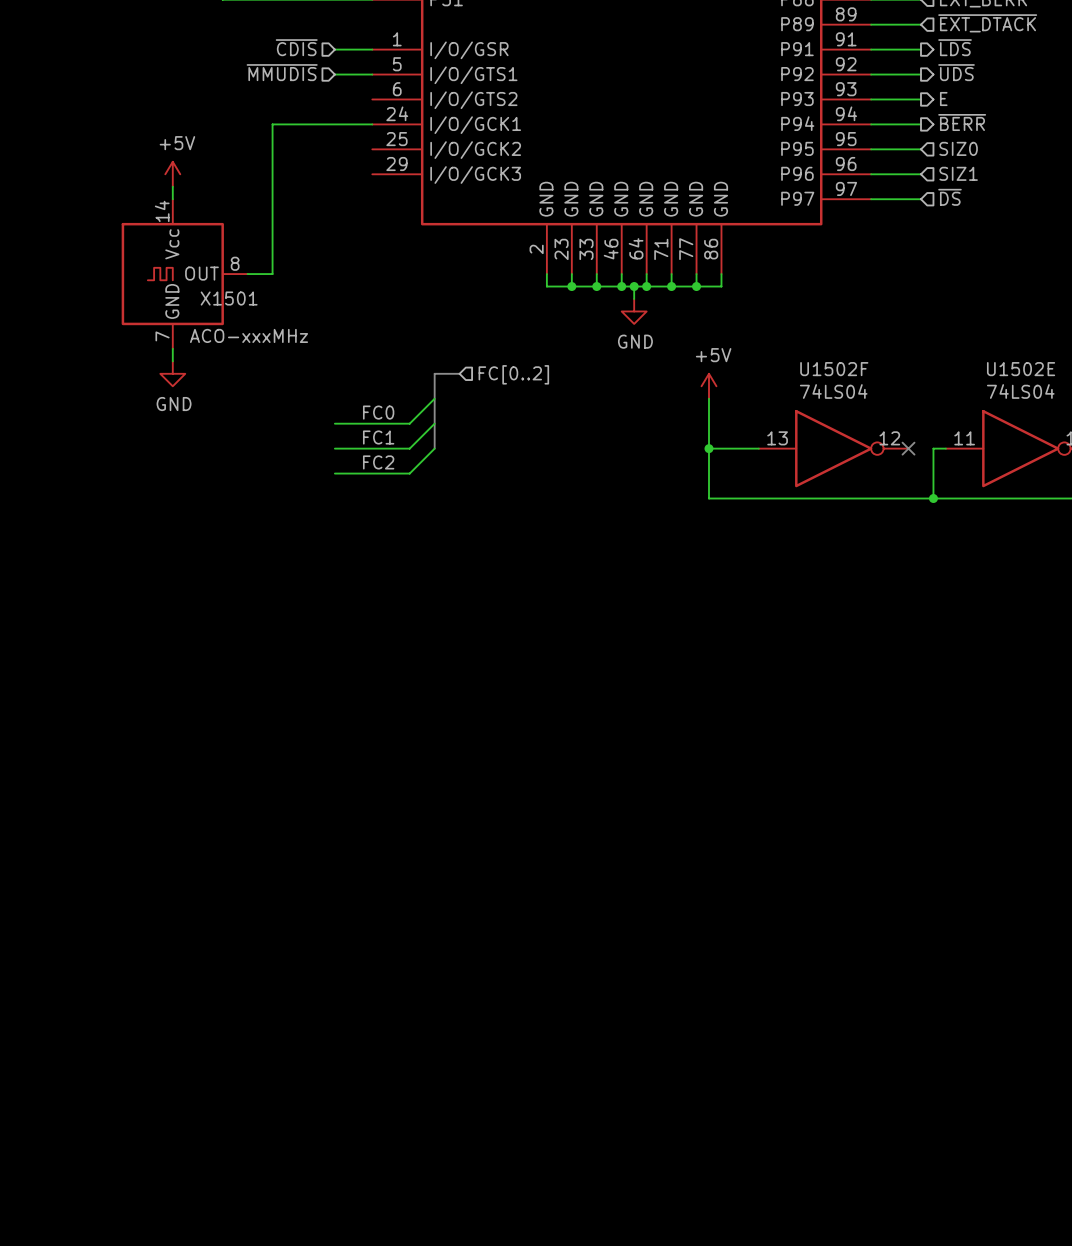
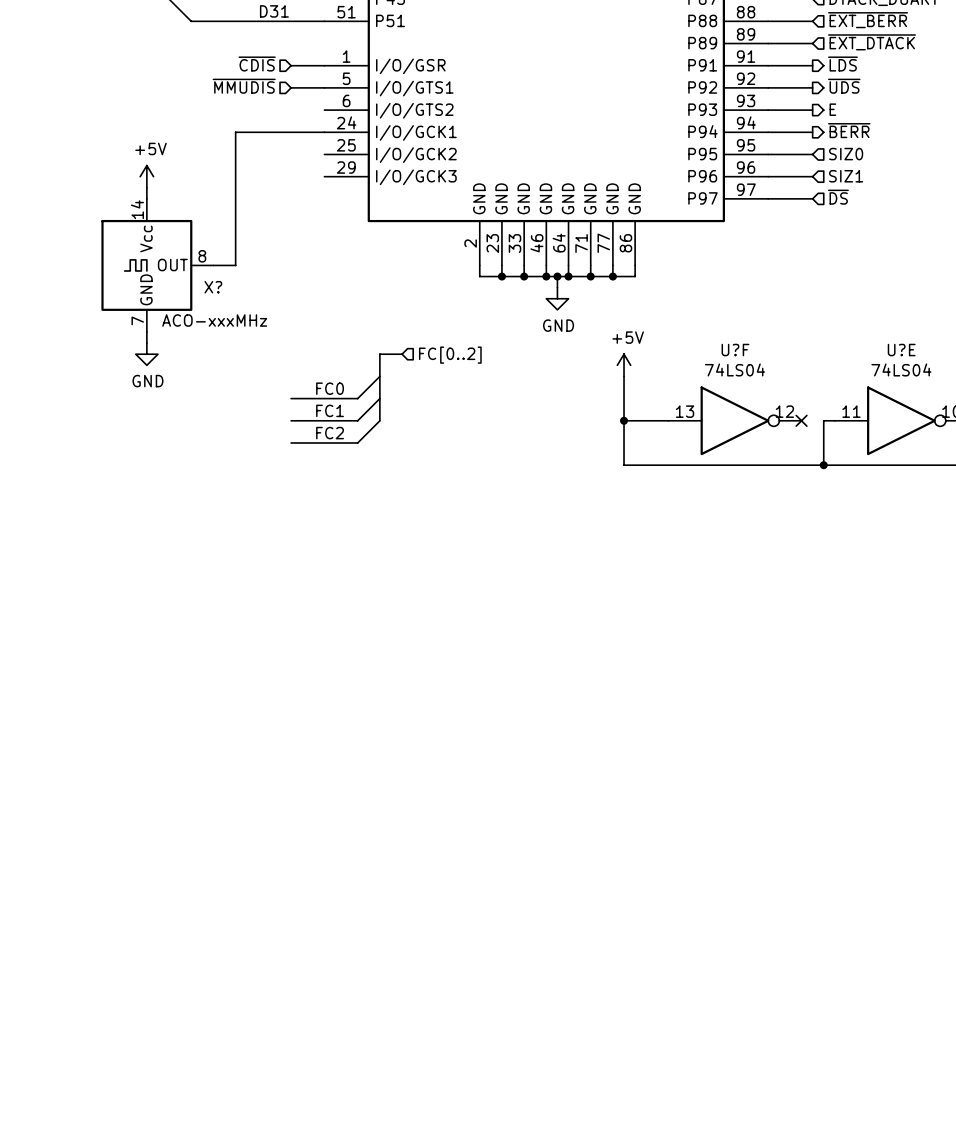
X1501 name: X1501 (229, 298) -> X? (213, 287)
U1502F name: U1502F (834, 369) -> U?F (735, 350)
U1502E name: U1502E (1021, 369) -> U?E (901, 350)

